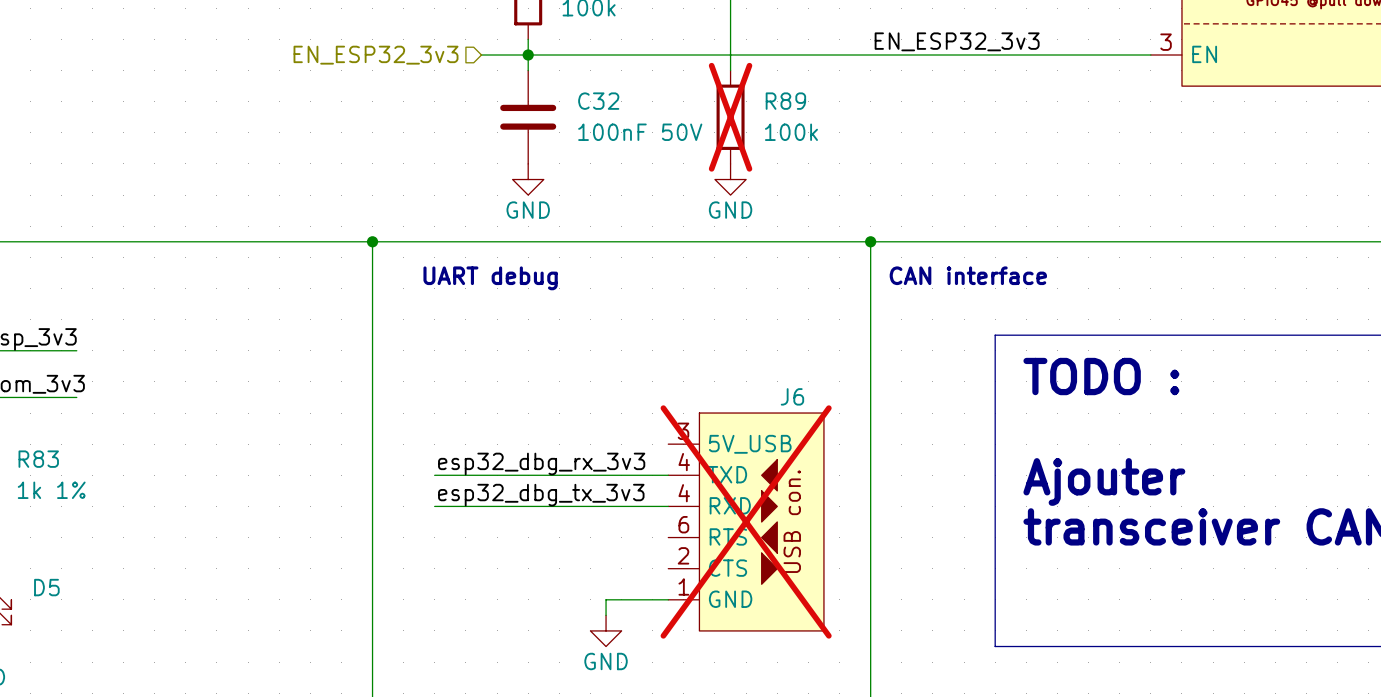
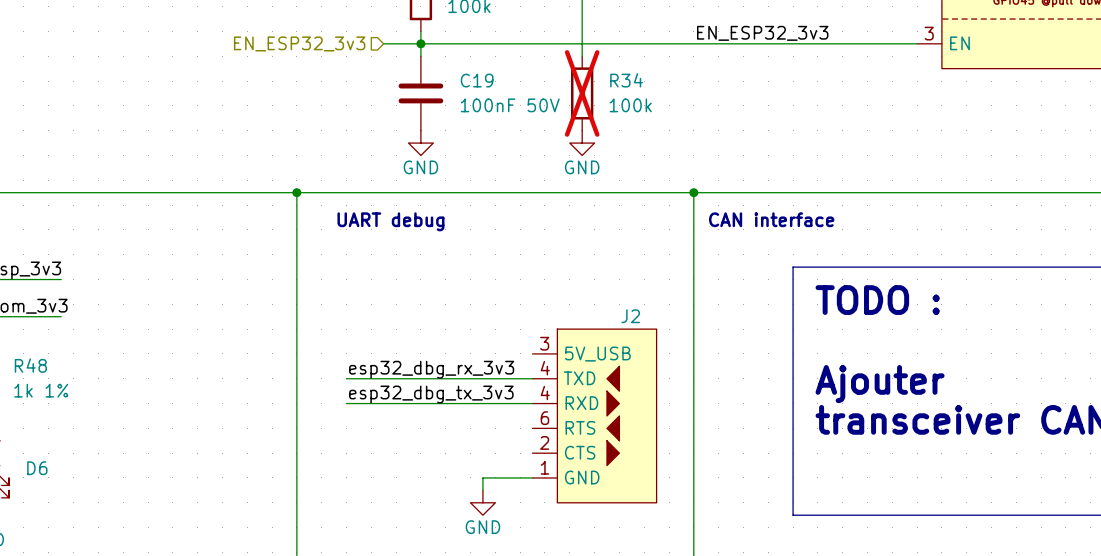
C32 name: C32 (598, 101) -> C19 (477, 80)
R89 name: R89 (785, 101) -> R34 (626, 80)
J6 name: J6 (792, 396) -> J2 (630, 316)
R83 name: R83 (38, 459) -> R48 (30, 365)
J6 do-not-place cross: (746, 521) -> none
J6 text: USB con. (792, 521) -> none
D5 name: D5 (46, 587) -> D6 (37, 468)

